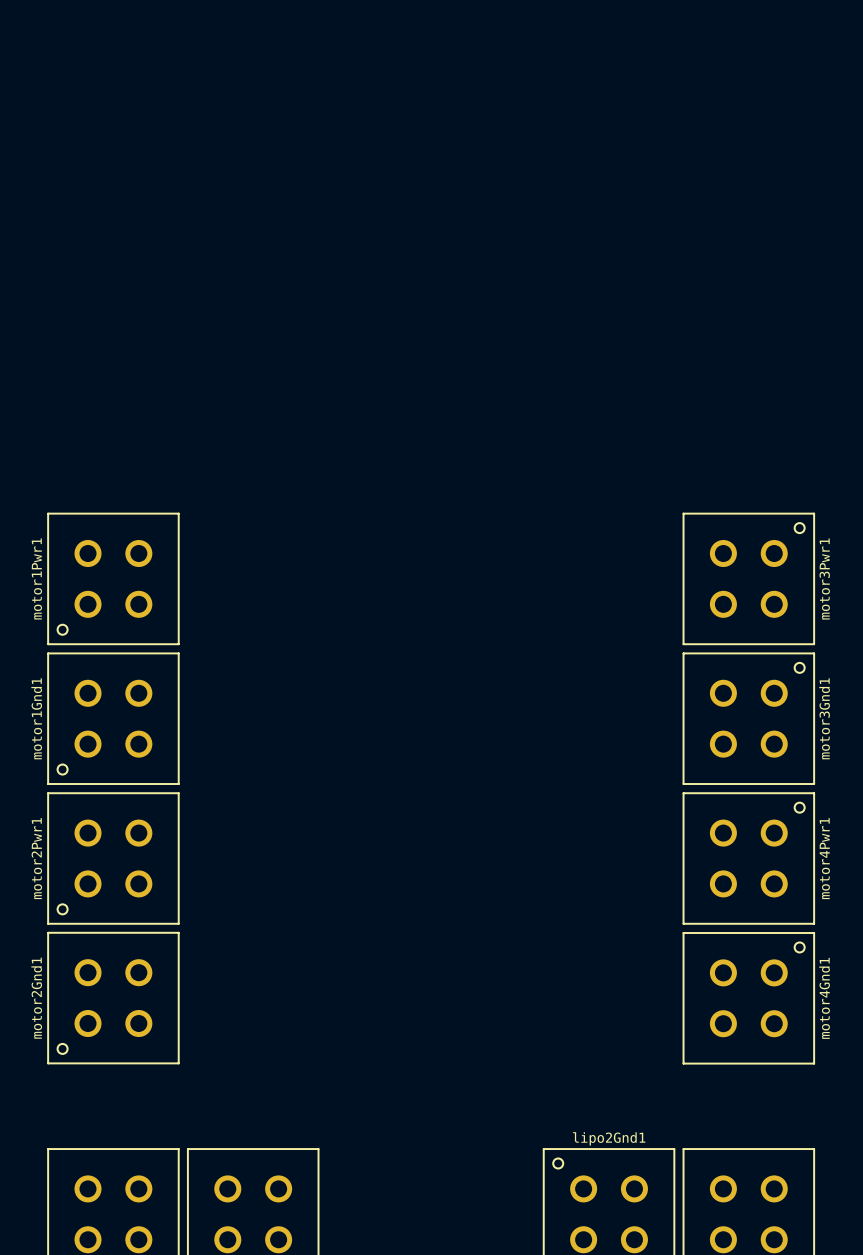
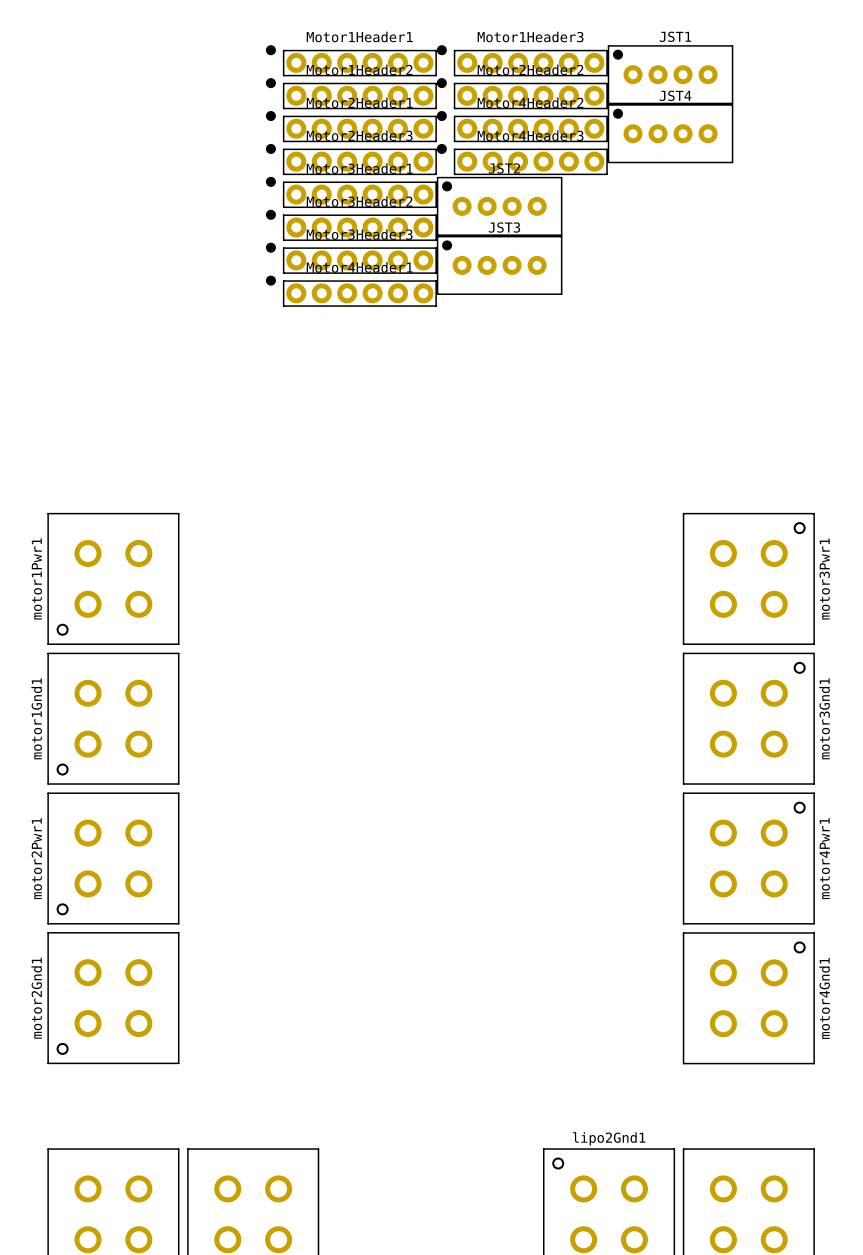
Motor1Header1: none -> (351, 60)
Motor1Header3: none -> (522, 60)
JST1: none -> (670, 74)
Motor1Header2: none -> (351, 93)
Motor2Header2: none -> (522, 93)
Motor2Header1: none -> (351, 126)
Motor4Header2: none -> (522, 126)
JST4: none -> (670, 133)
Motor2Header3: none -> (351, 159)
Motor4Header3: none -> (522, 159)
Motor3Header1: none -> (351, 192)
JST2: none -> (499, 206)
Motor3Header2: none -> (351, 225)
Motor3Header3: none -> (351, 258)
JST3: none -> (499, 265)
Motor4Header1: none -> (351, 291)

